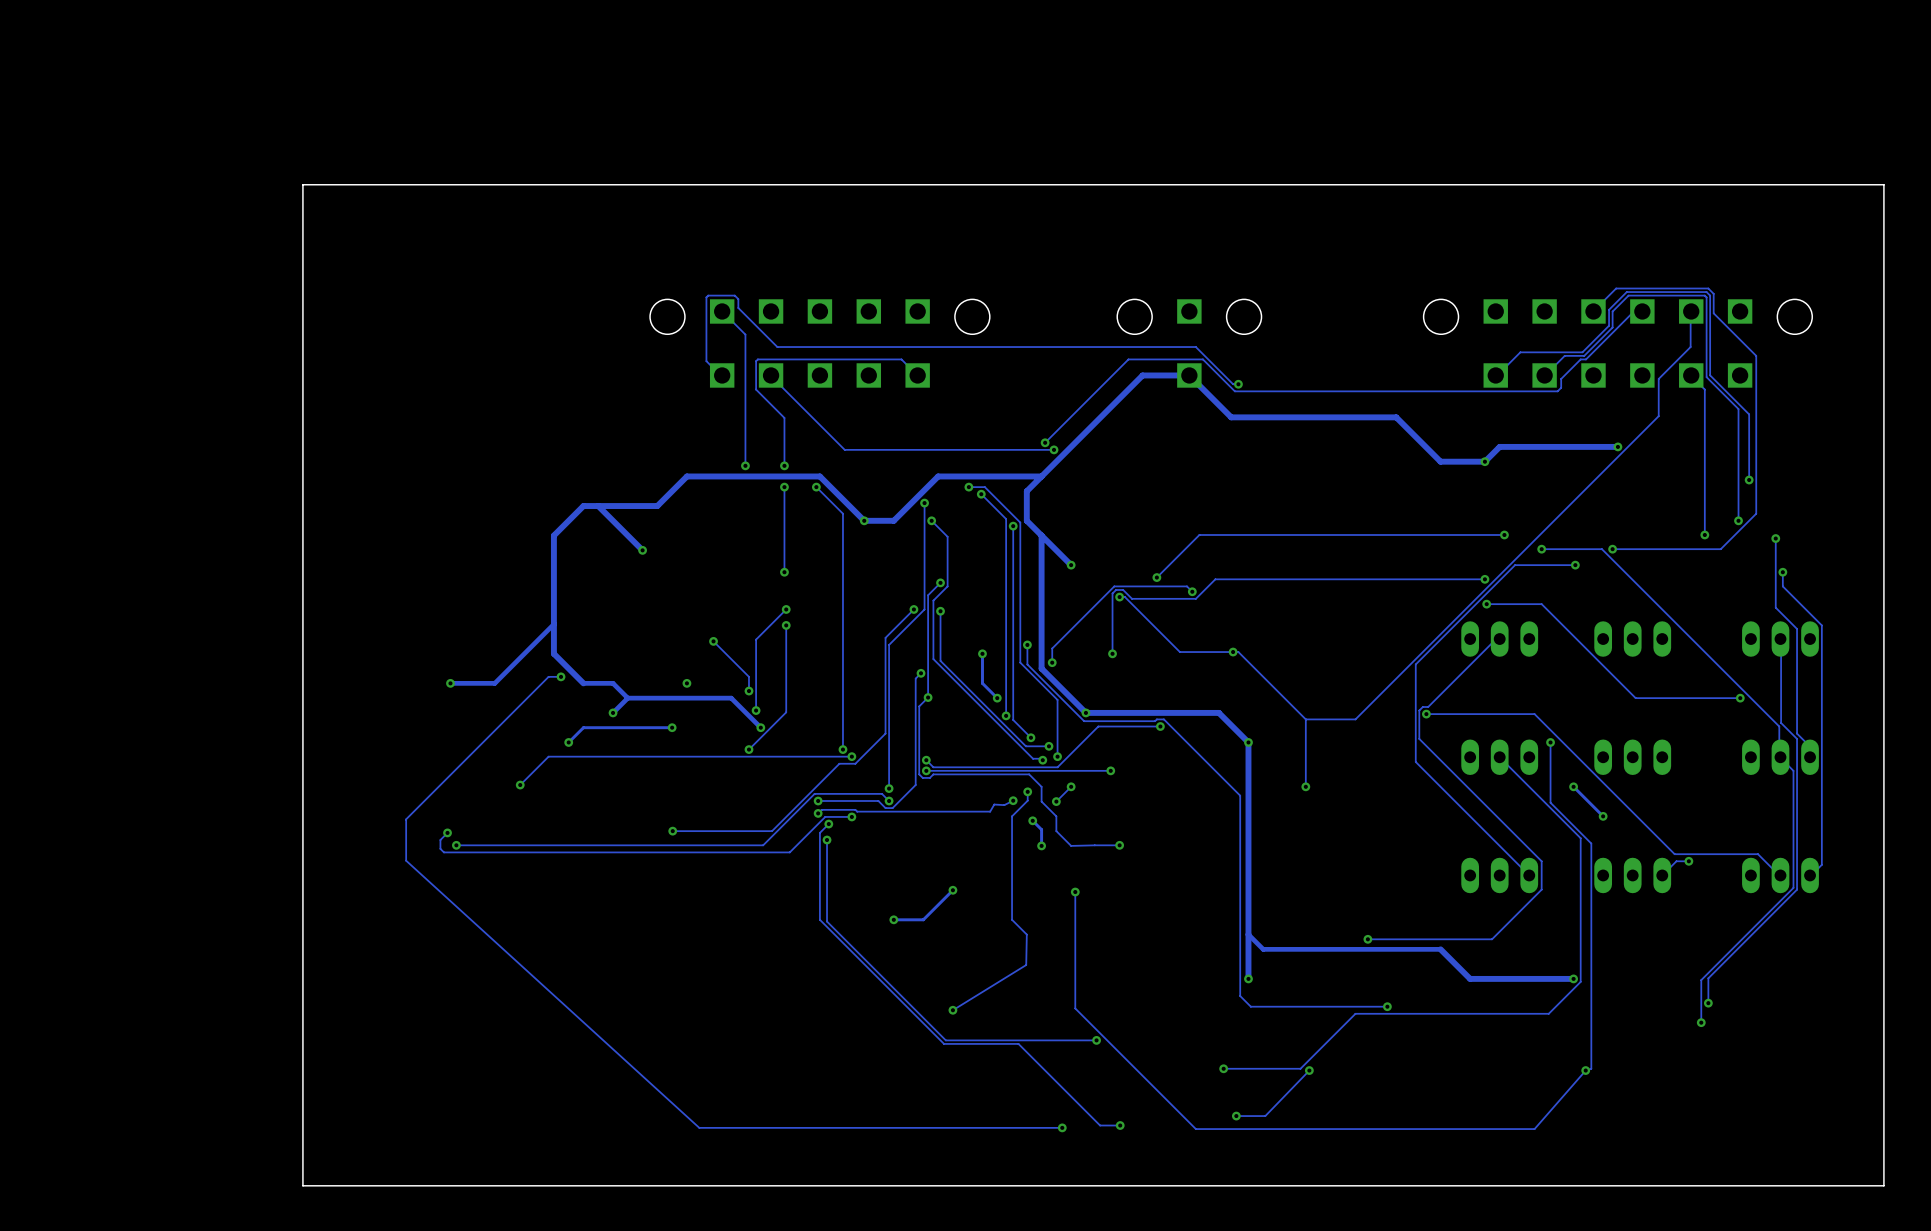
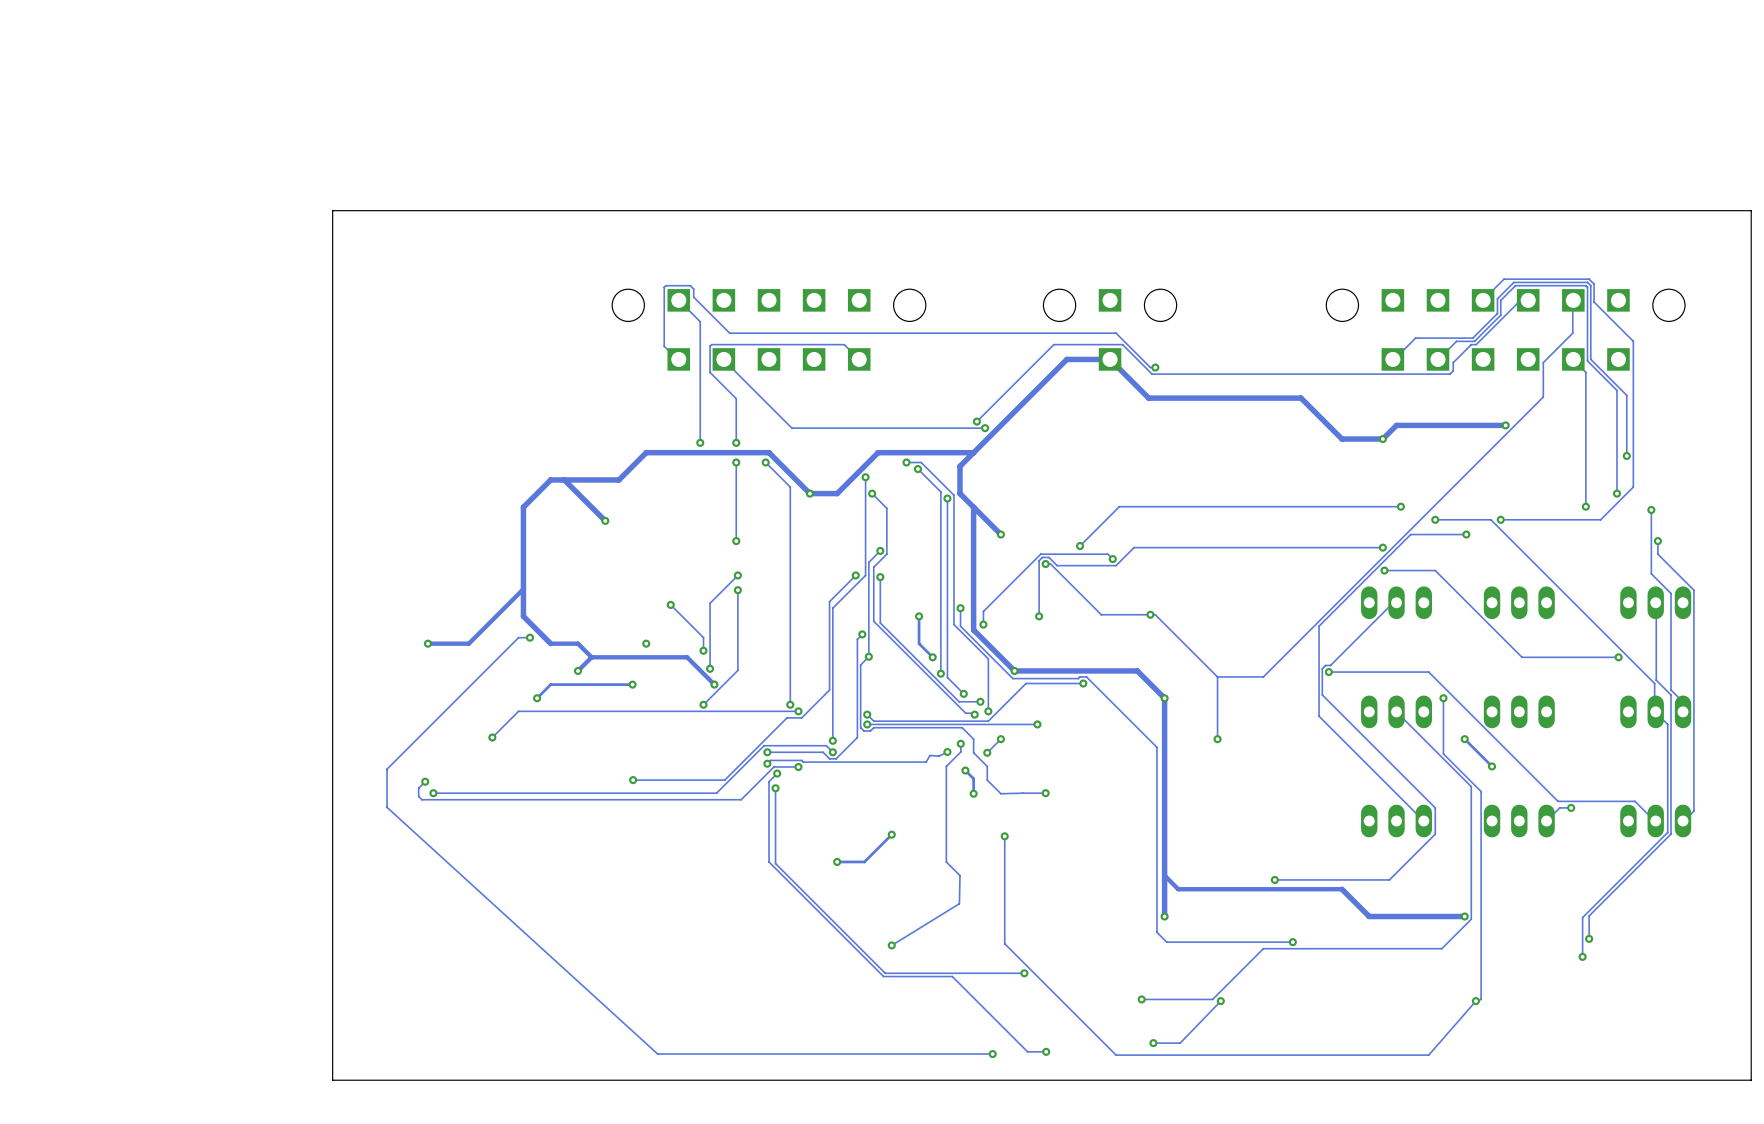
board edge: (1883, 214) (1883, 184) (302, 184) (302, 1185) (1883, 1185) (1883, 1156) -> (1751, 210) (332, 210) (332, 1080) (1751, 1080)

